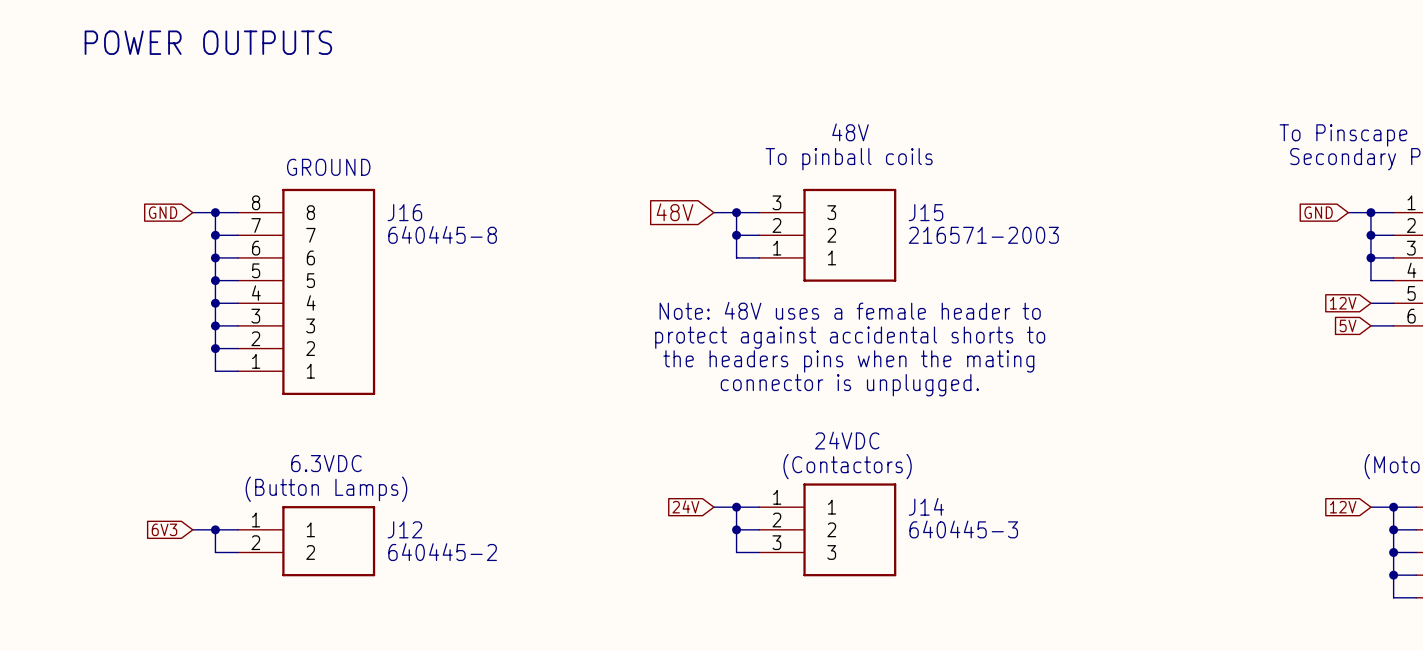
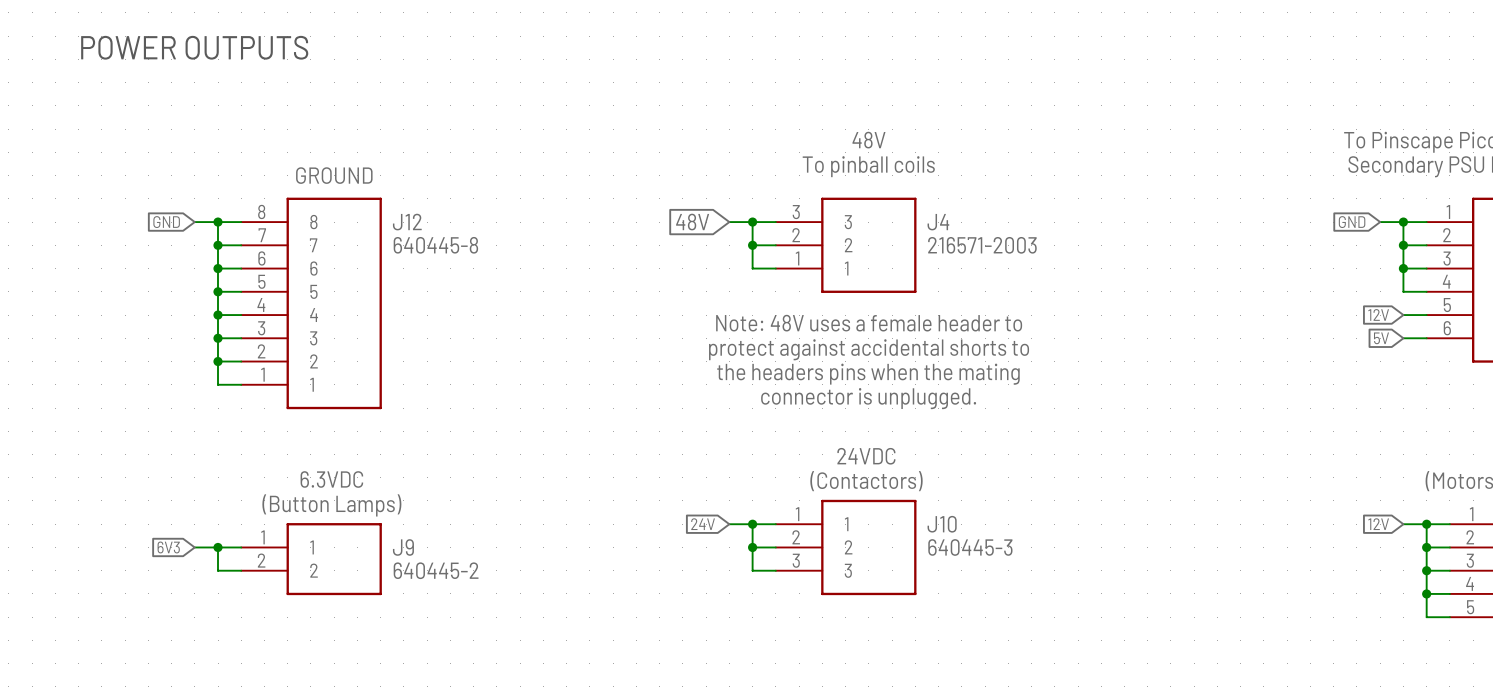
J16 name: J16 (404, 212) -> J12 (407, 222)
J15 name: J15 (926, 212) -> J4 (938, 222)
J14 name: J14 (926, 506) -> J10 (942, 524)
J12 name: J12 (404, 529) -> J9 (403, 547)

